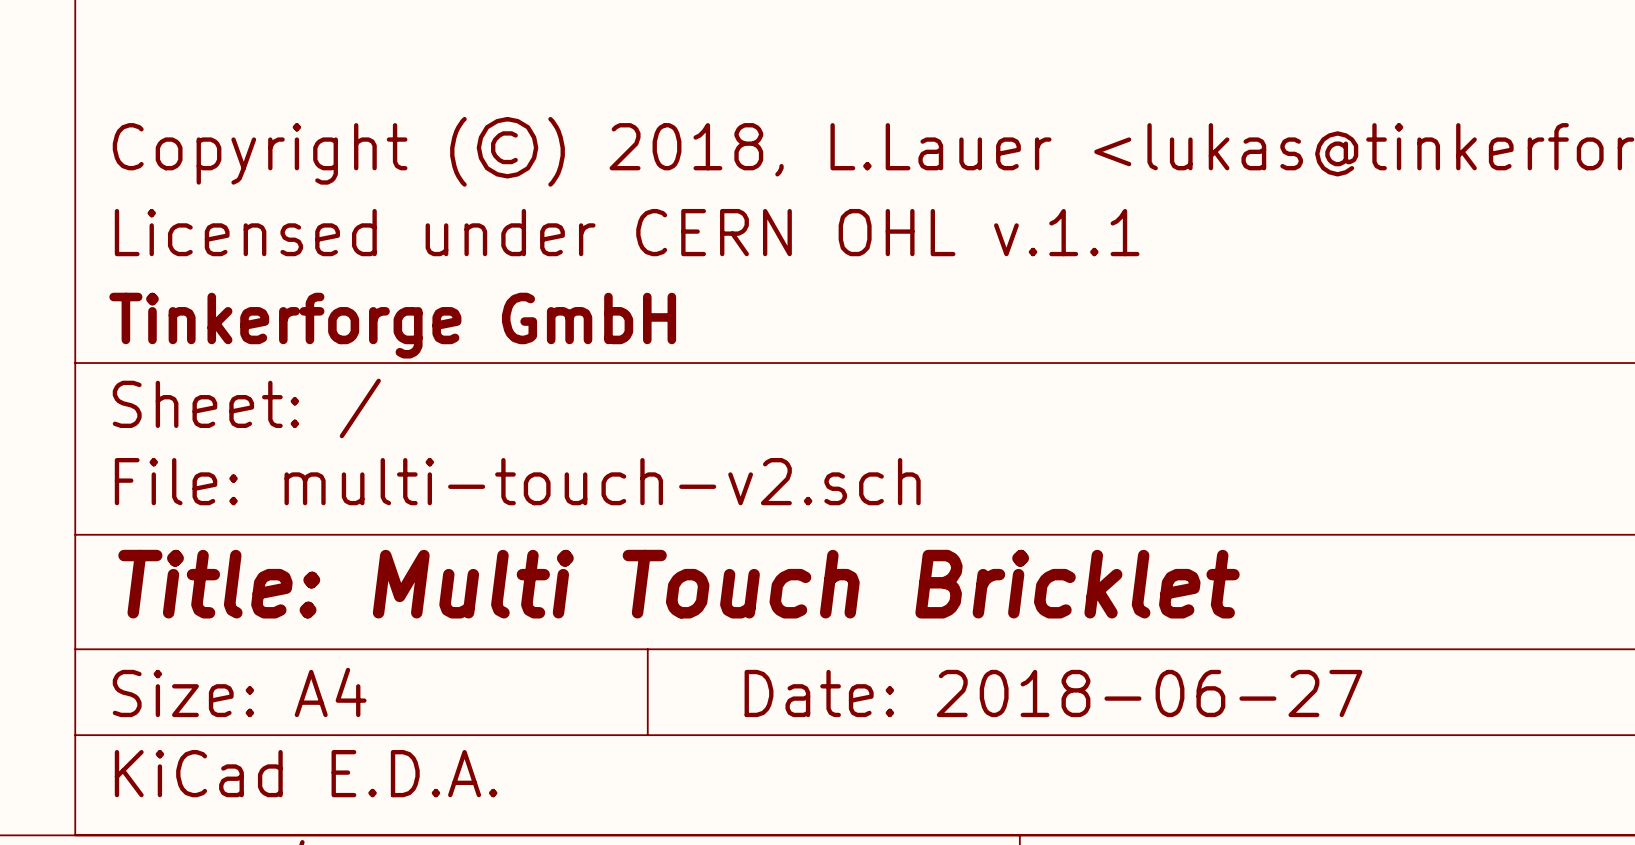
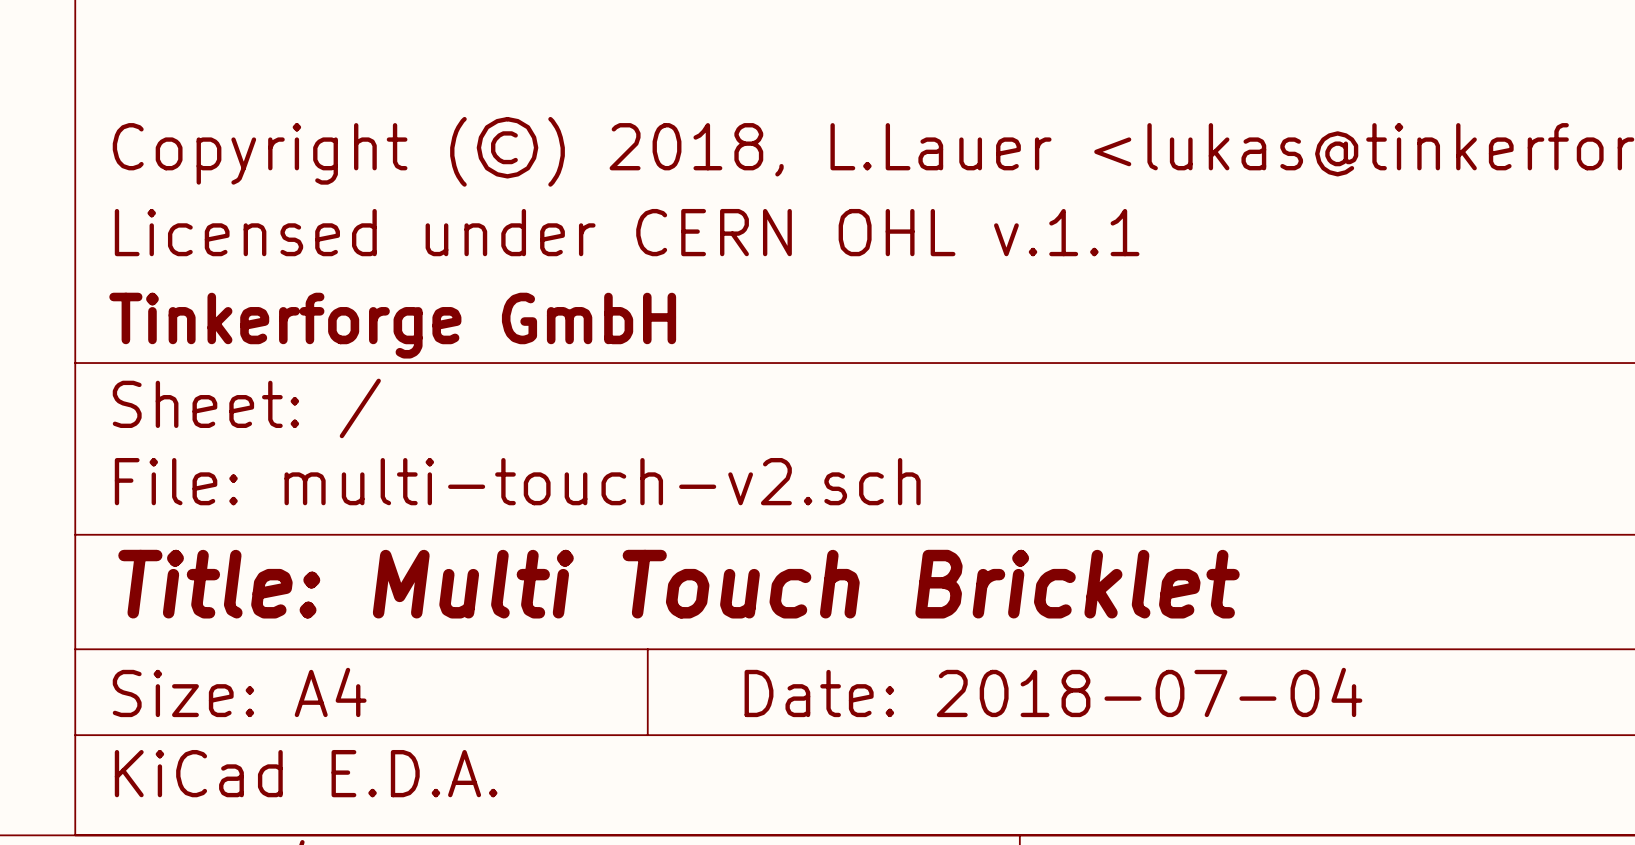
title block: Date: 2018-06-27 (1053, 693) -> Date: 2018-07-04 (1053, 692)

